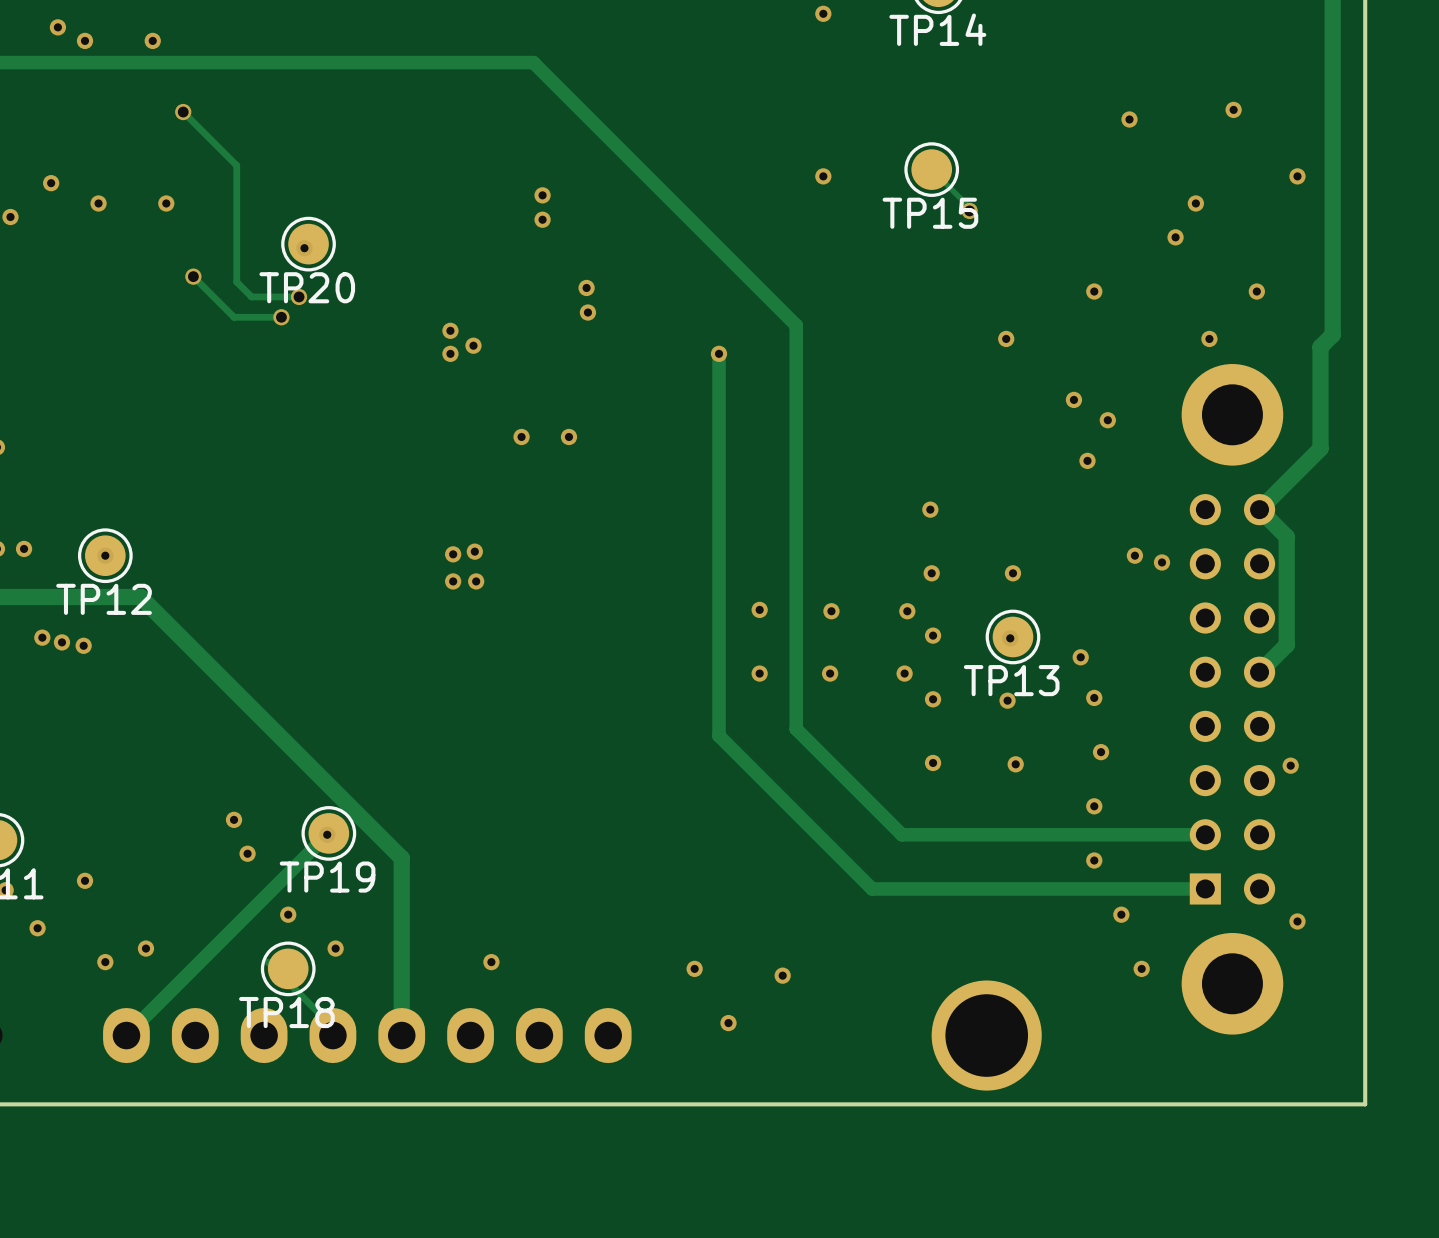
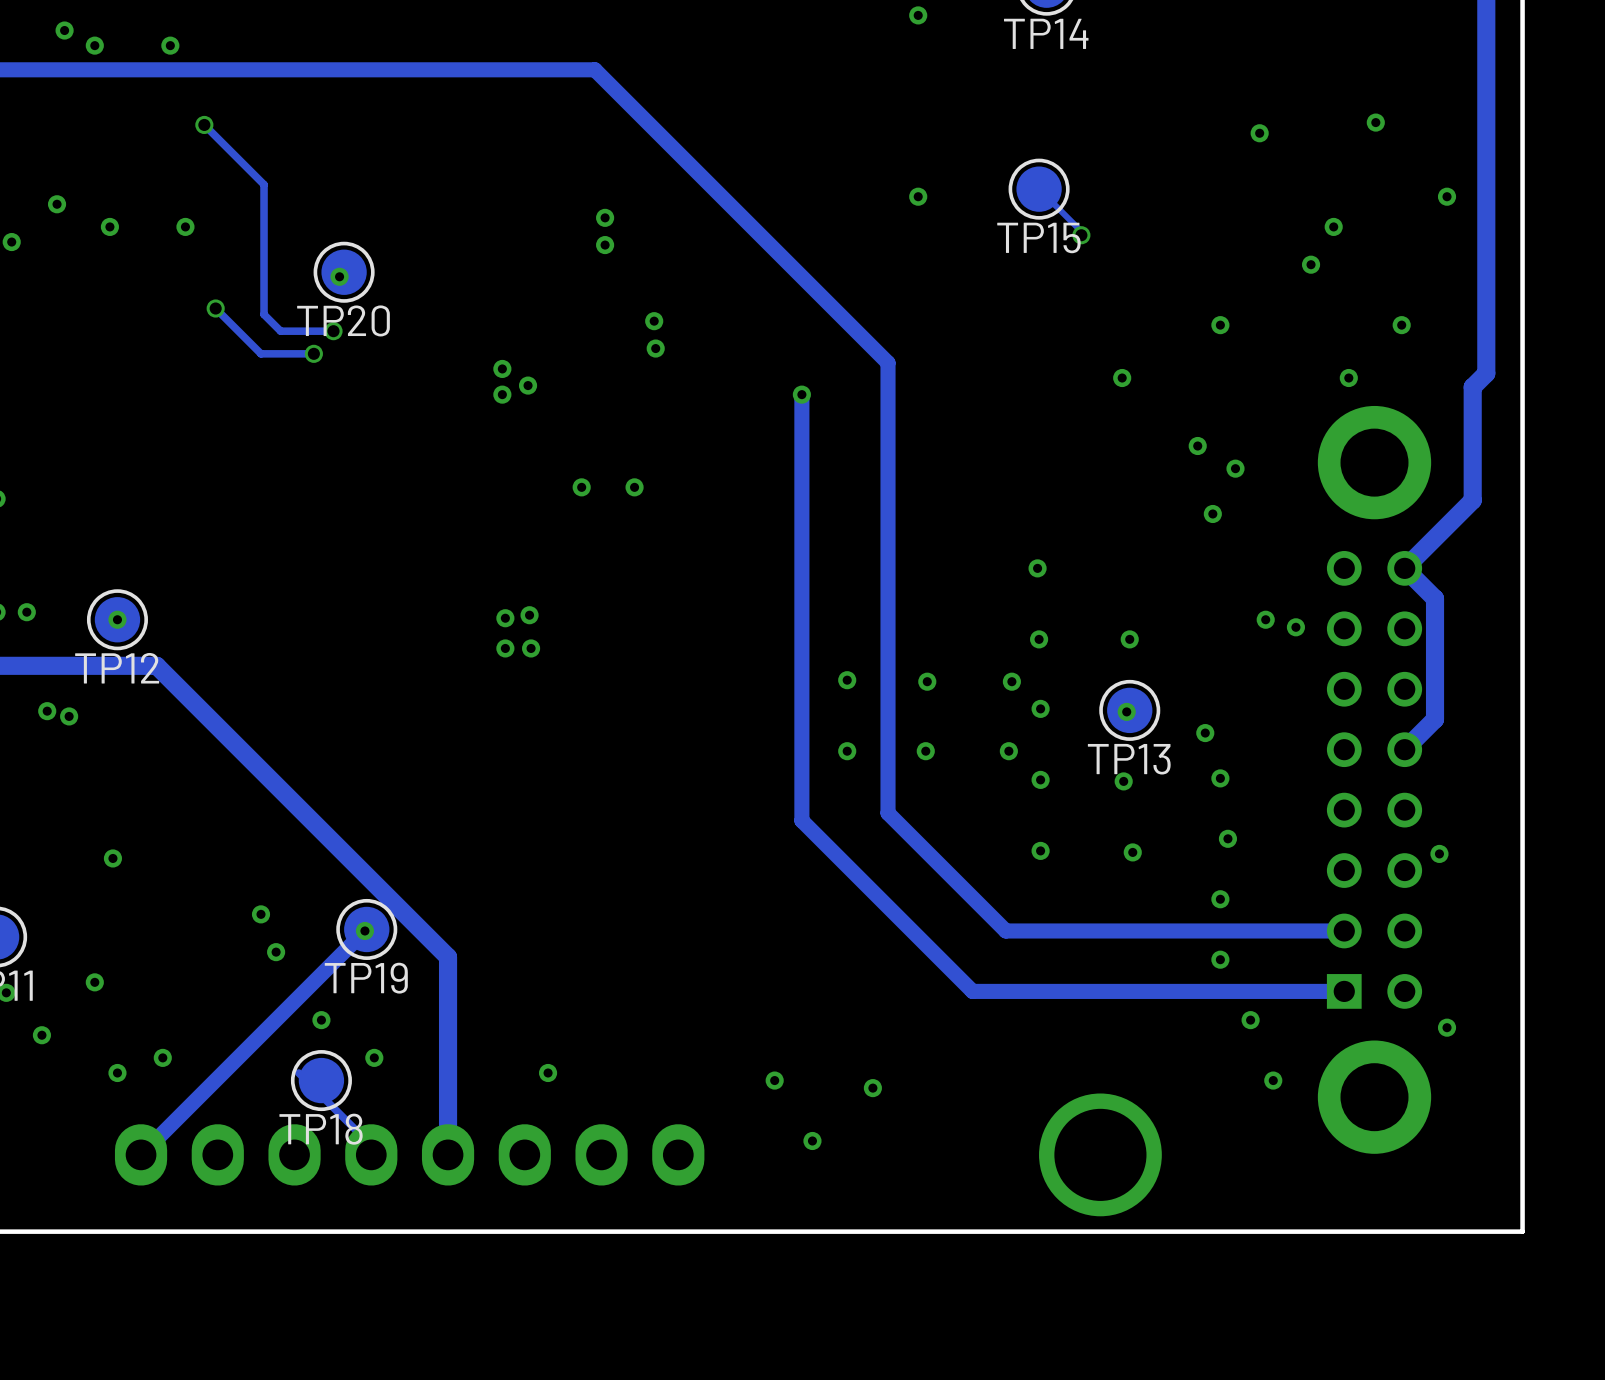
via position: (83, 645) -> (112, 858)

